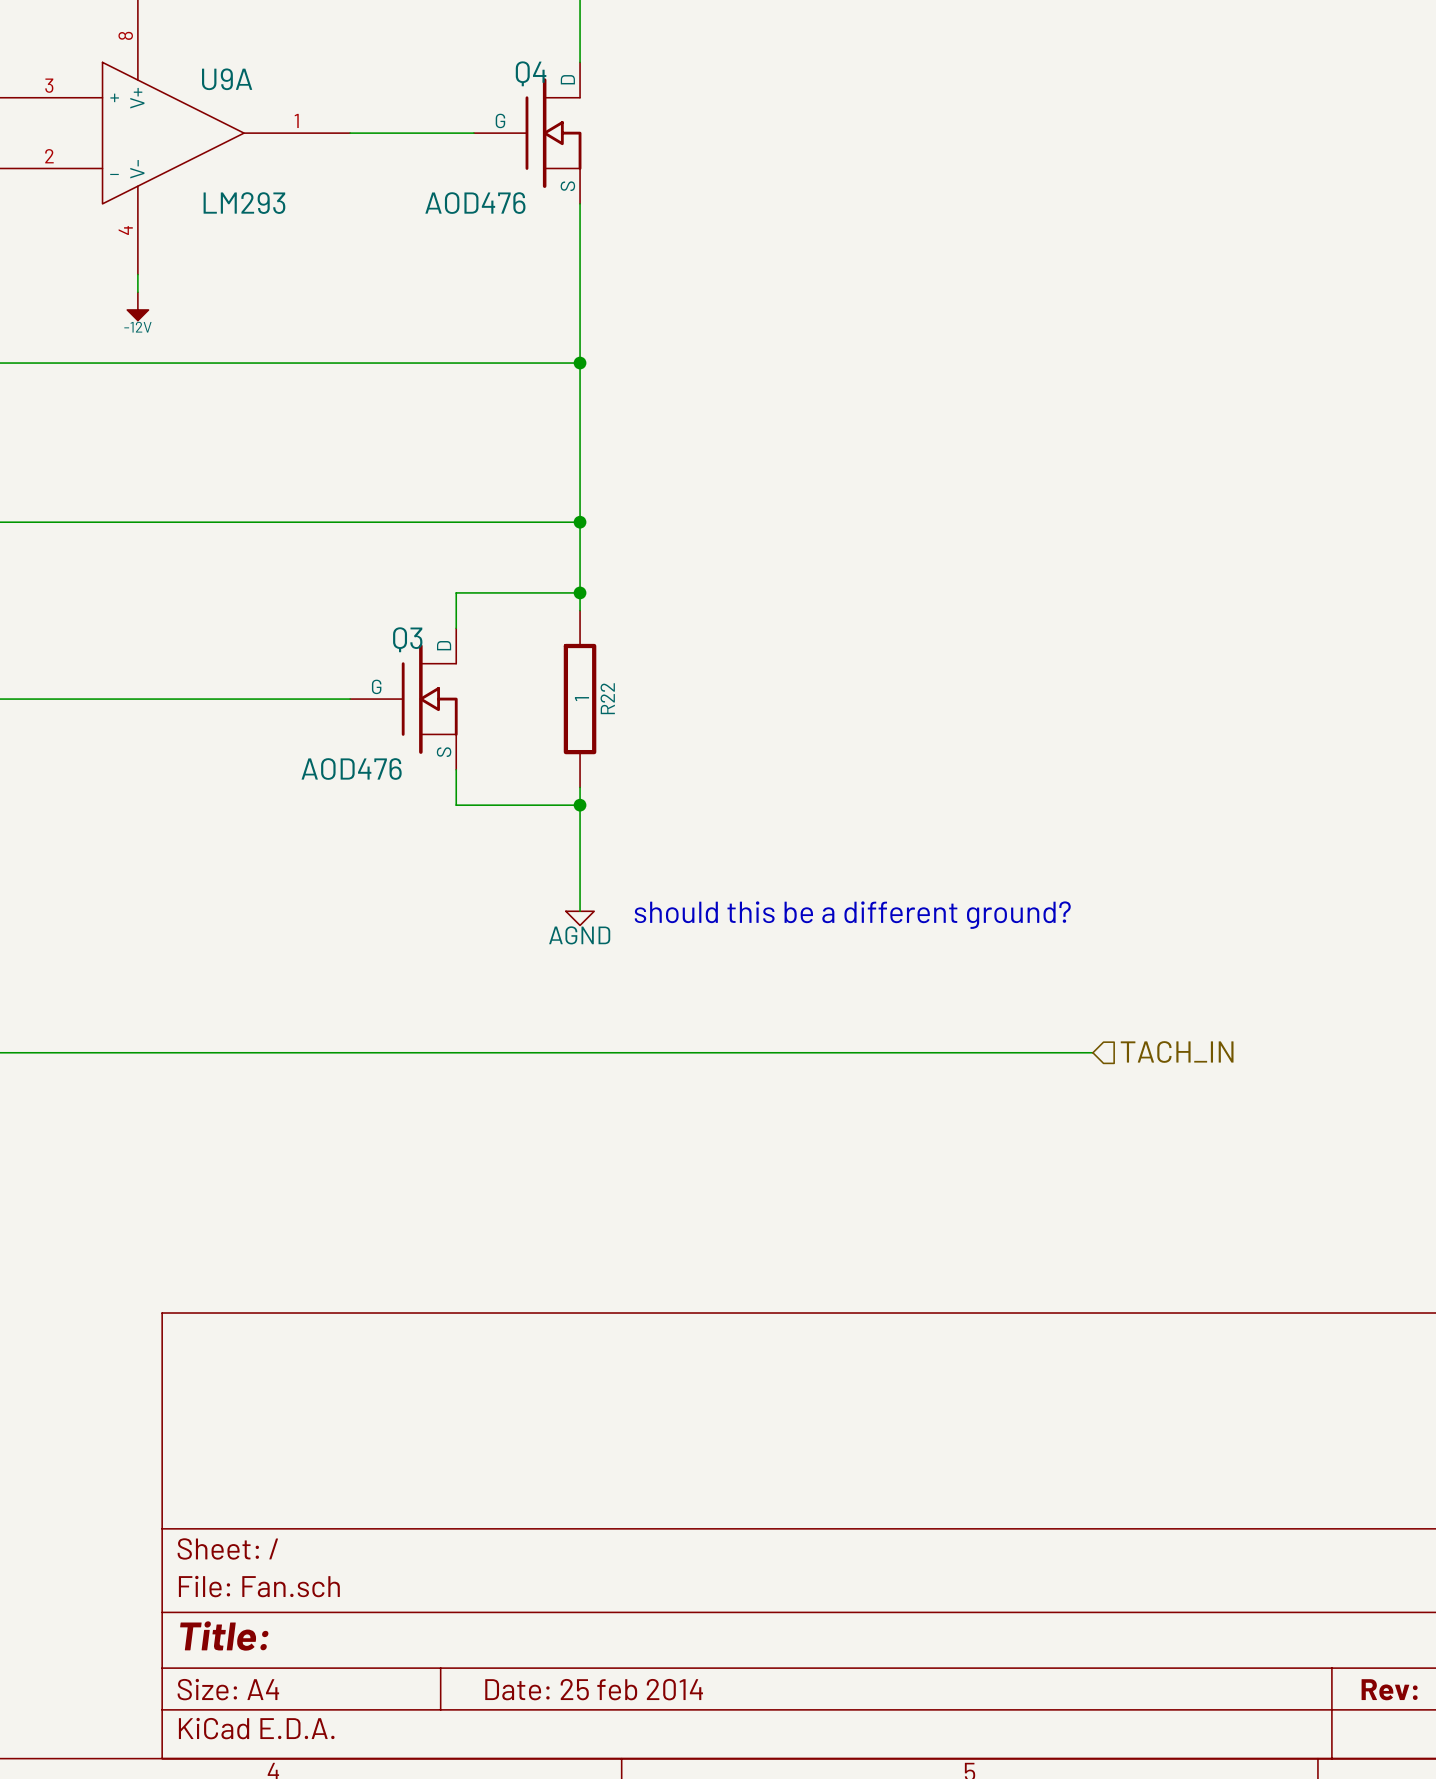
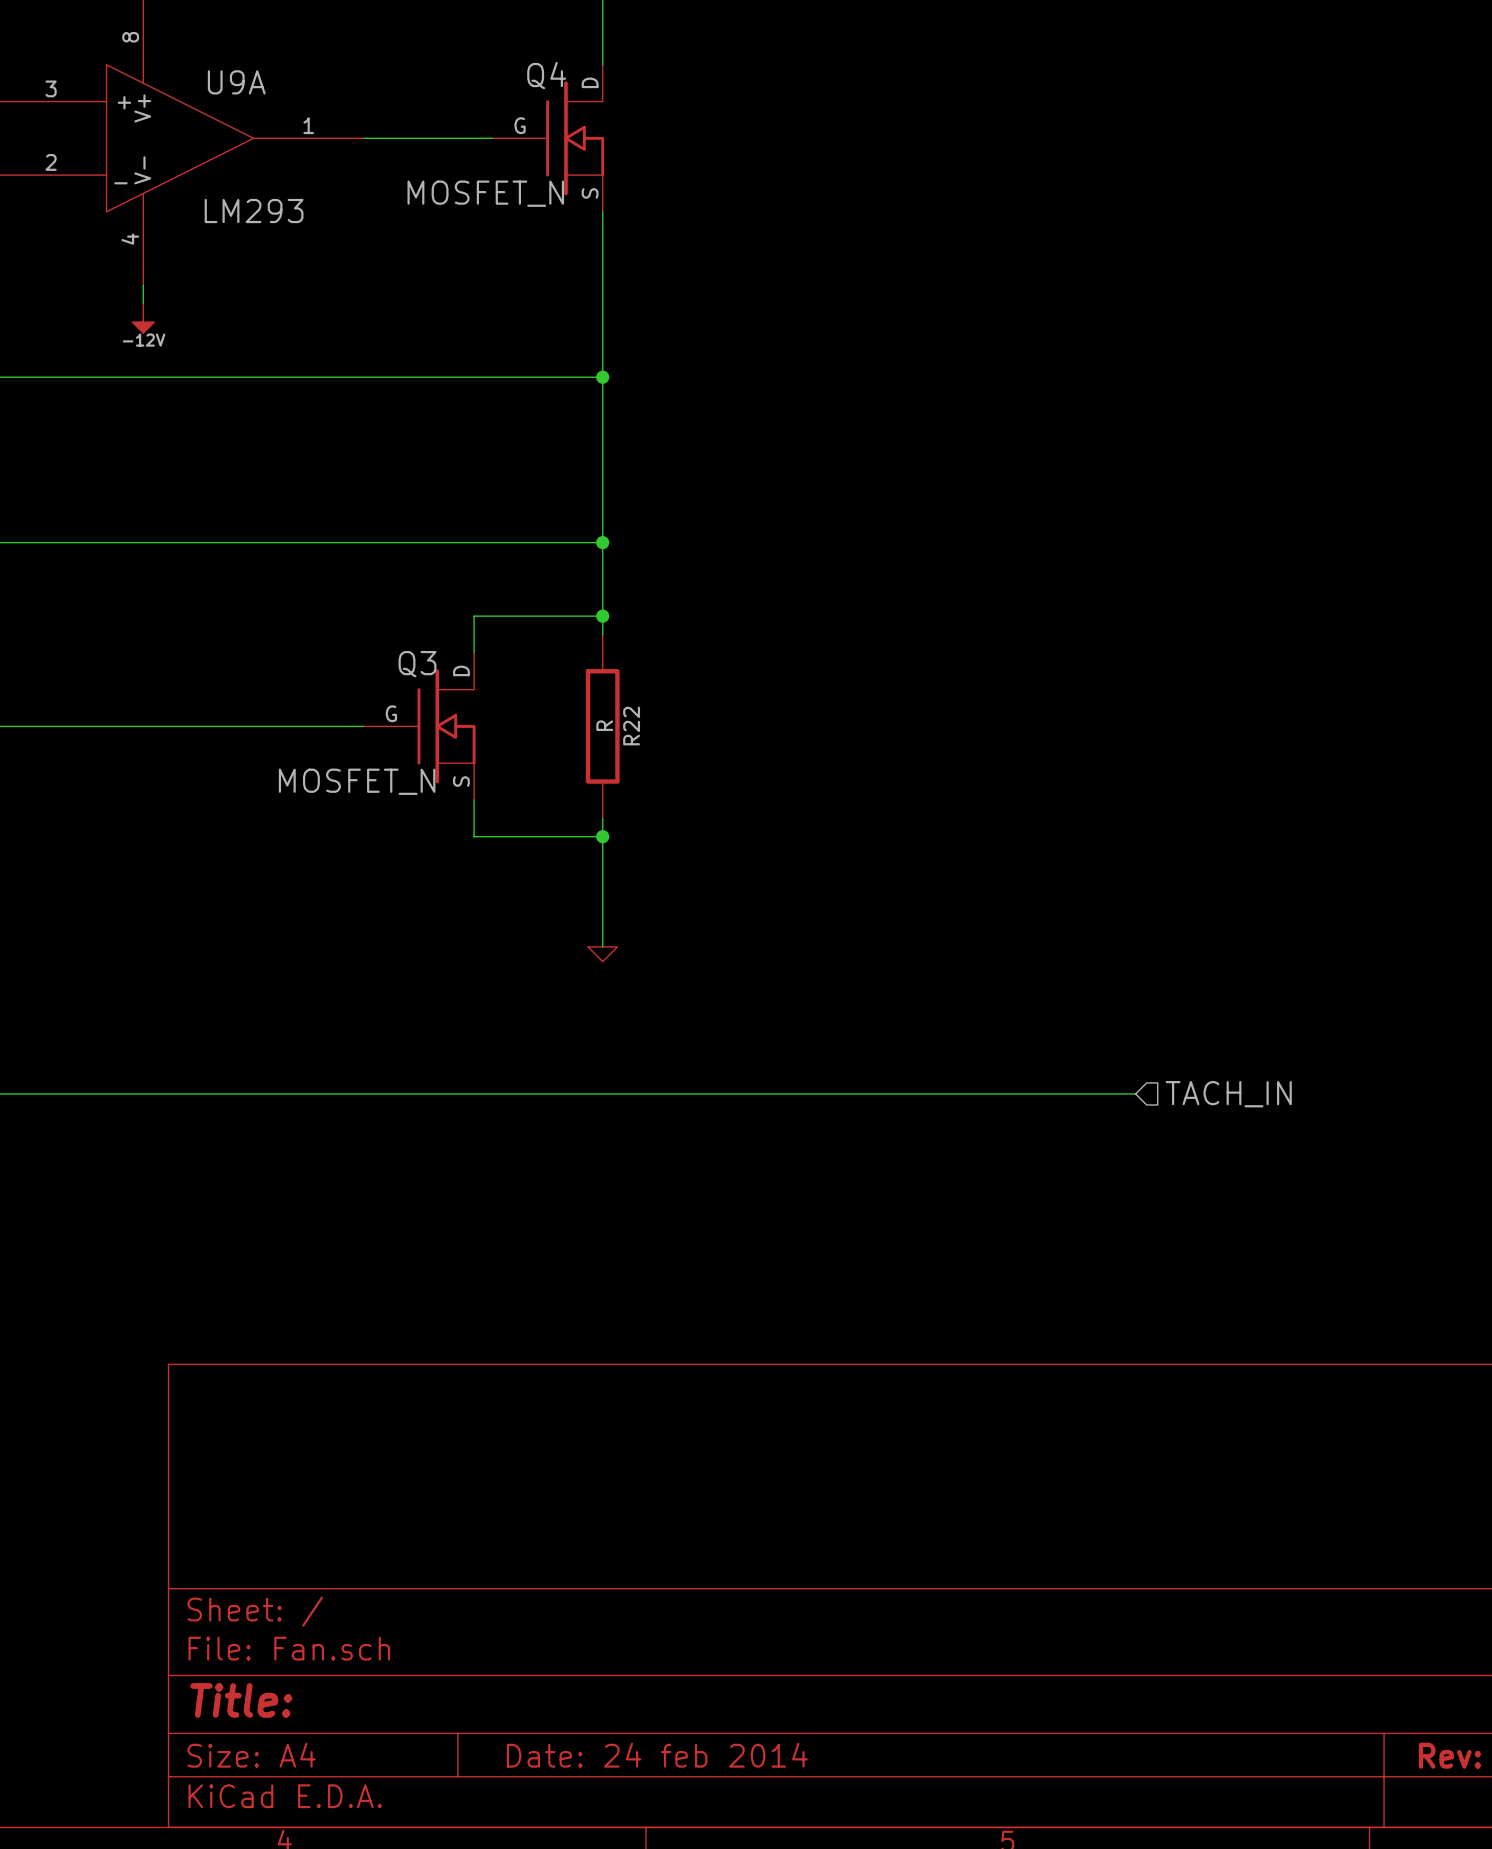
Q4 value: AOD476 (475, 203) -> MOSFET_N (485, 193)
R22 value: 1 (581, 699) -> R (604, 725)
Q3 value: AOD476 (351, 769) -> MOSFET_N (357, 781)
text: should this be a different ground? (852, 915) -> none
power symbol text: AGND (579, 935) -> none
title block: Date: 25 feb 2014 (594, 1689) -> Date: 24 feb 2014 (657, 1755)

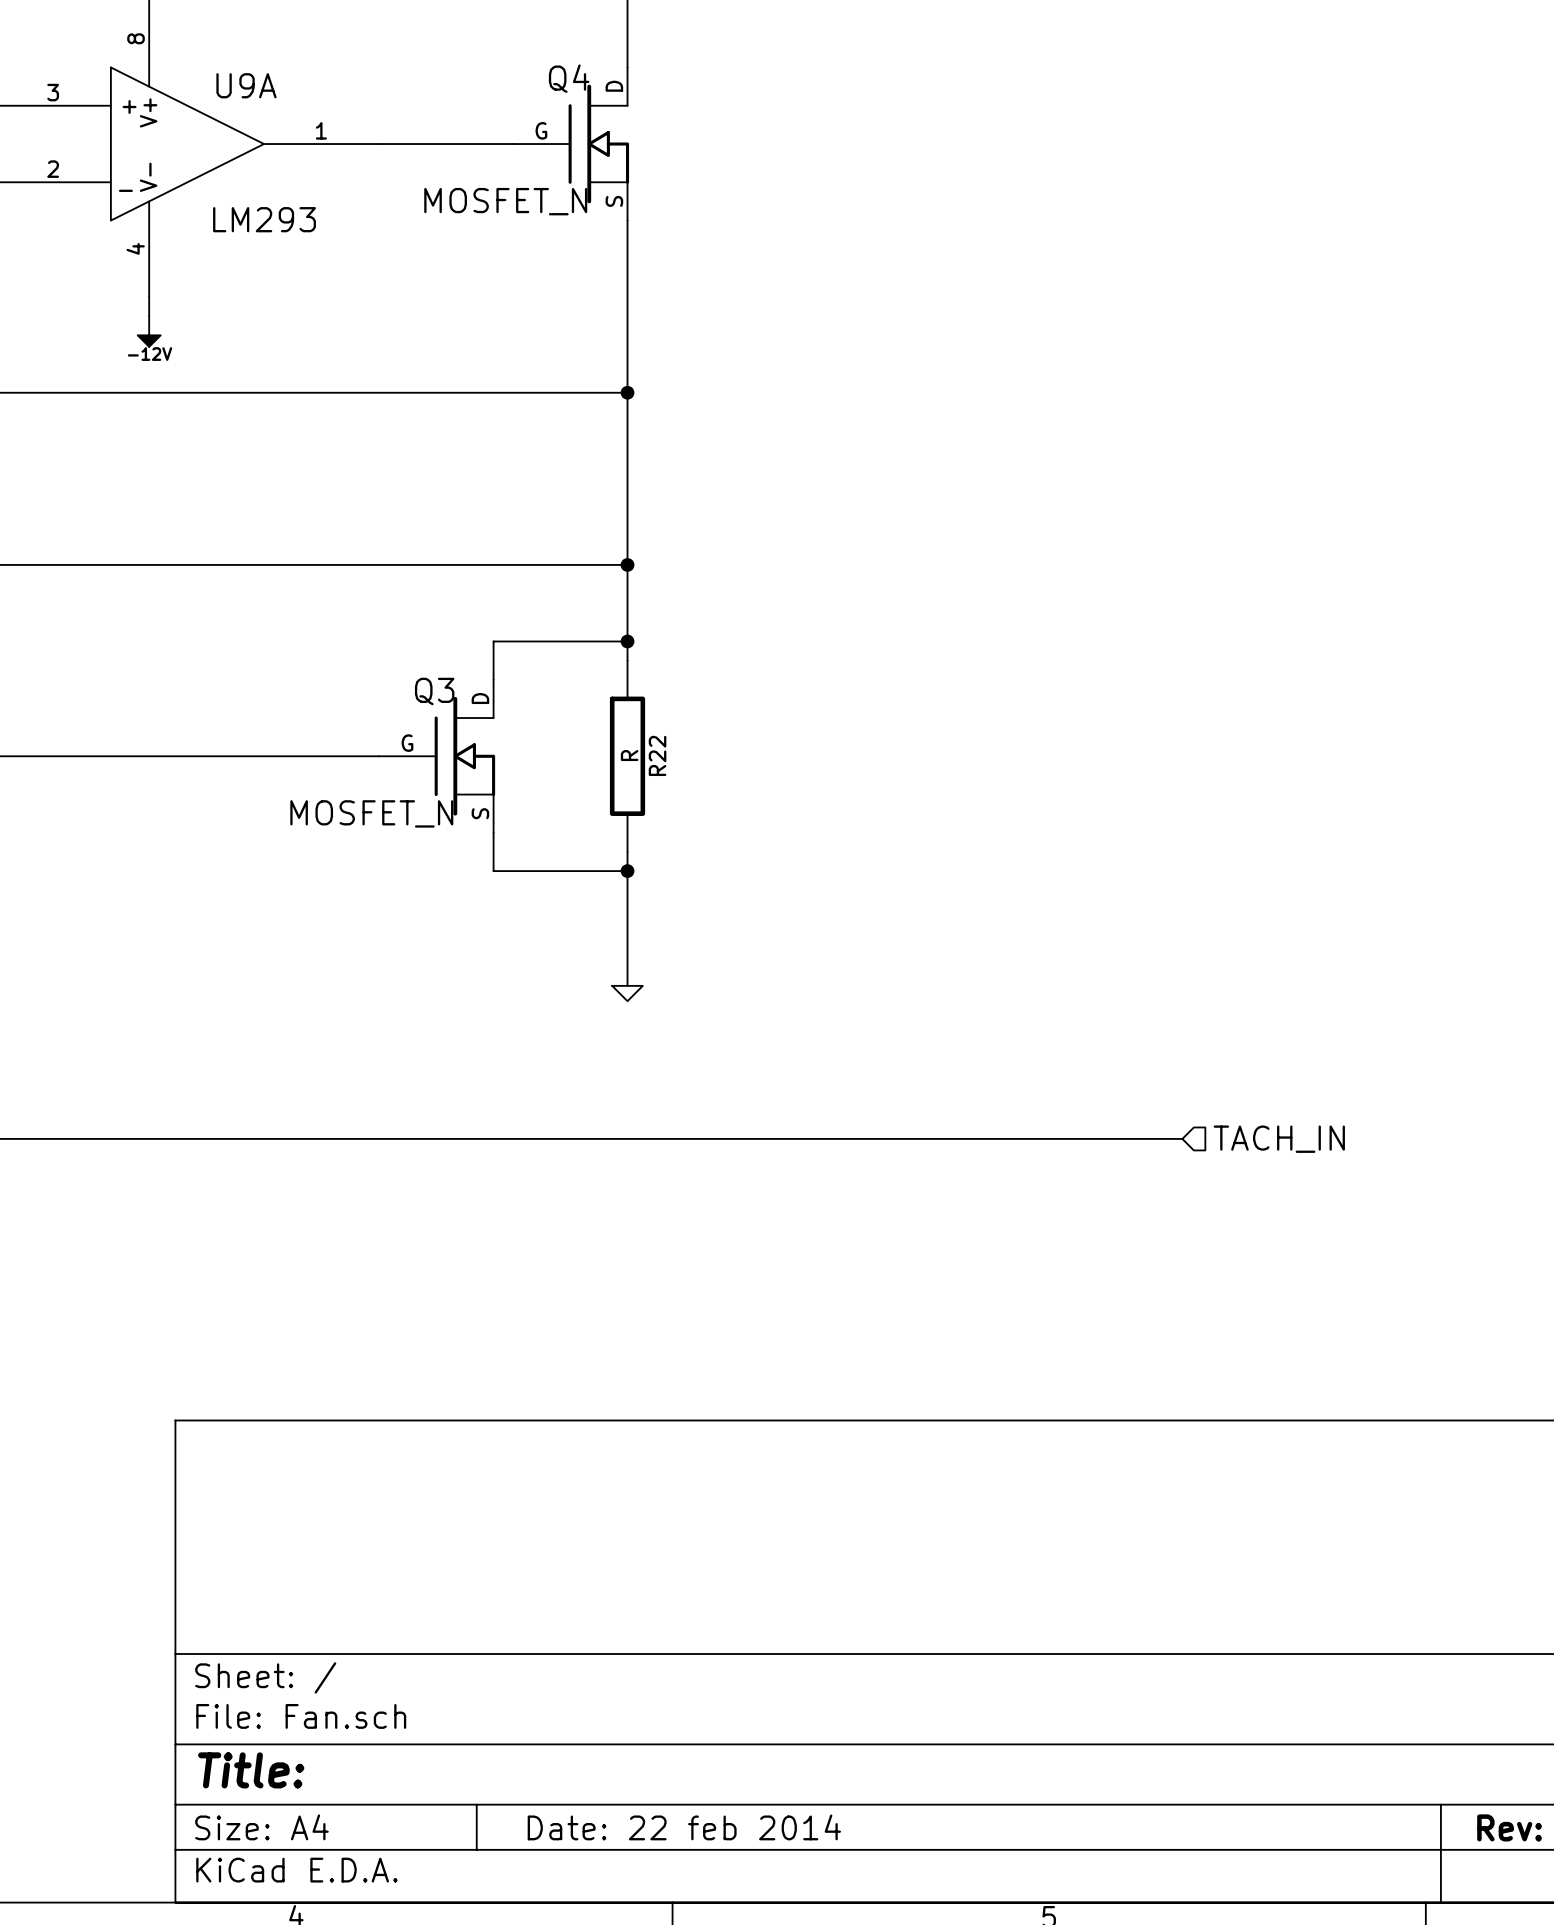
title block: Date: 24 feb 2014 (657, 1755) -> Date: 22 feb 2014 (684, 1827)

